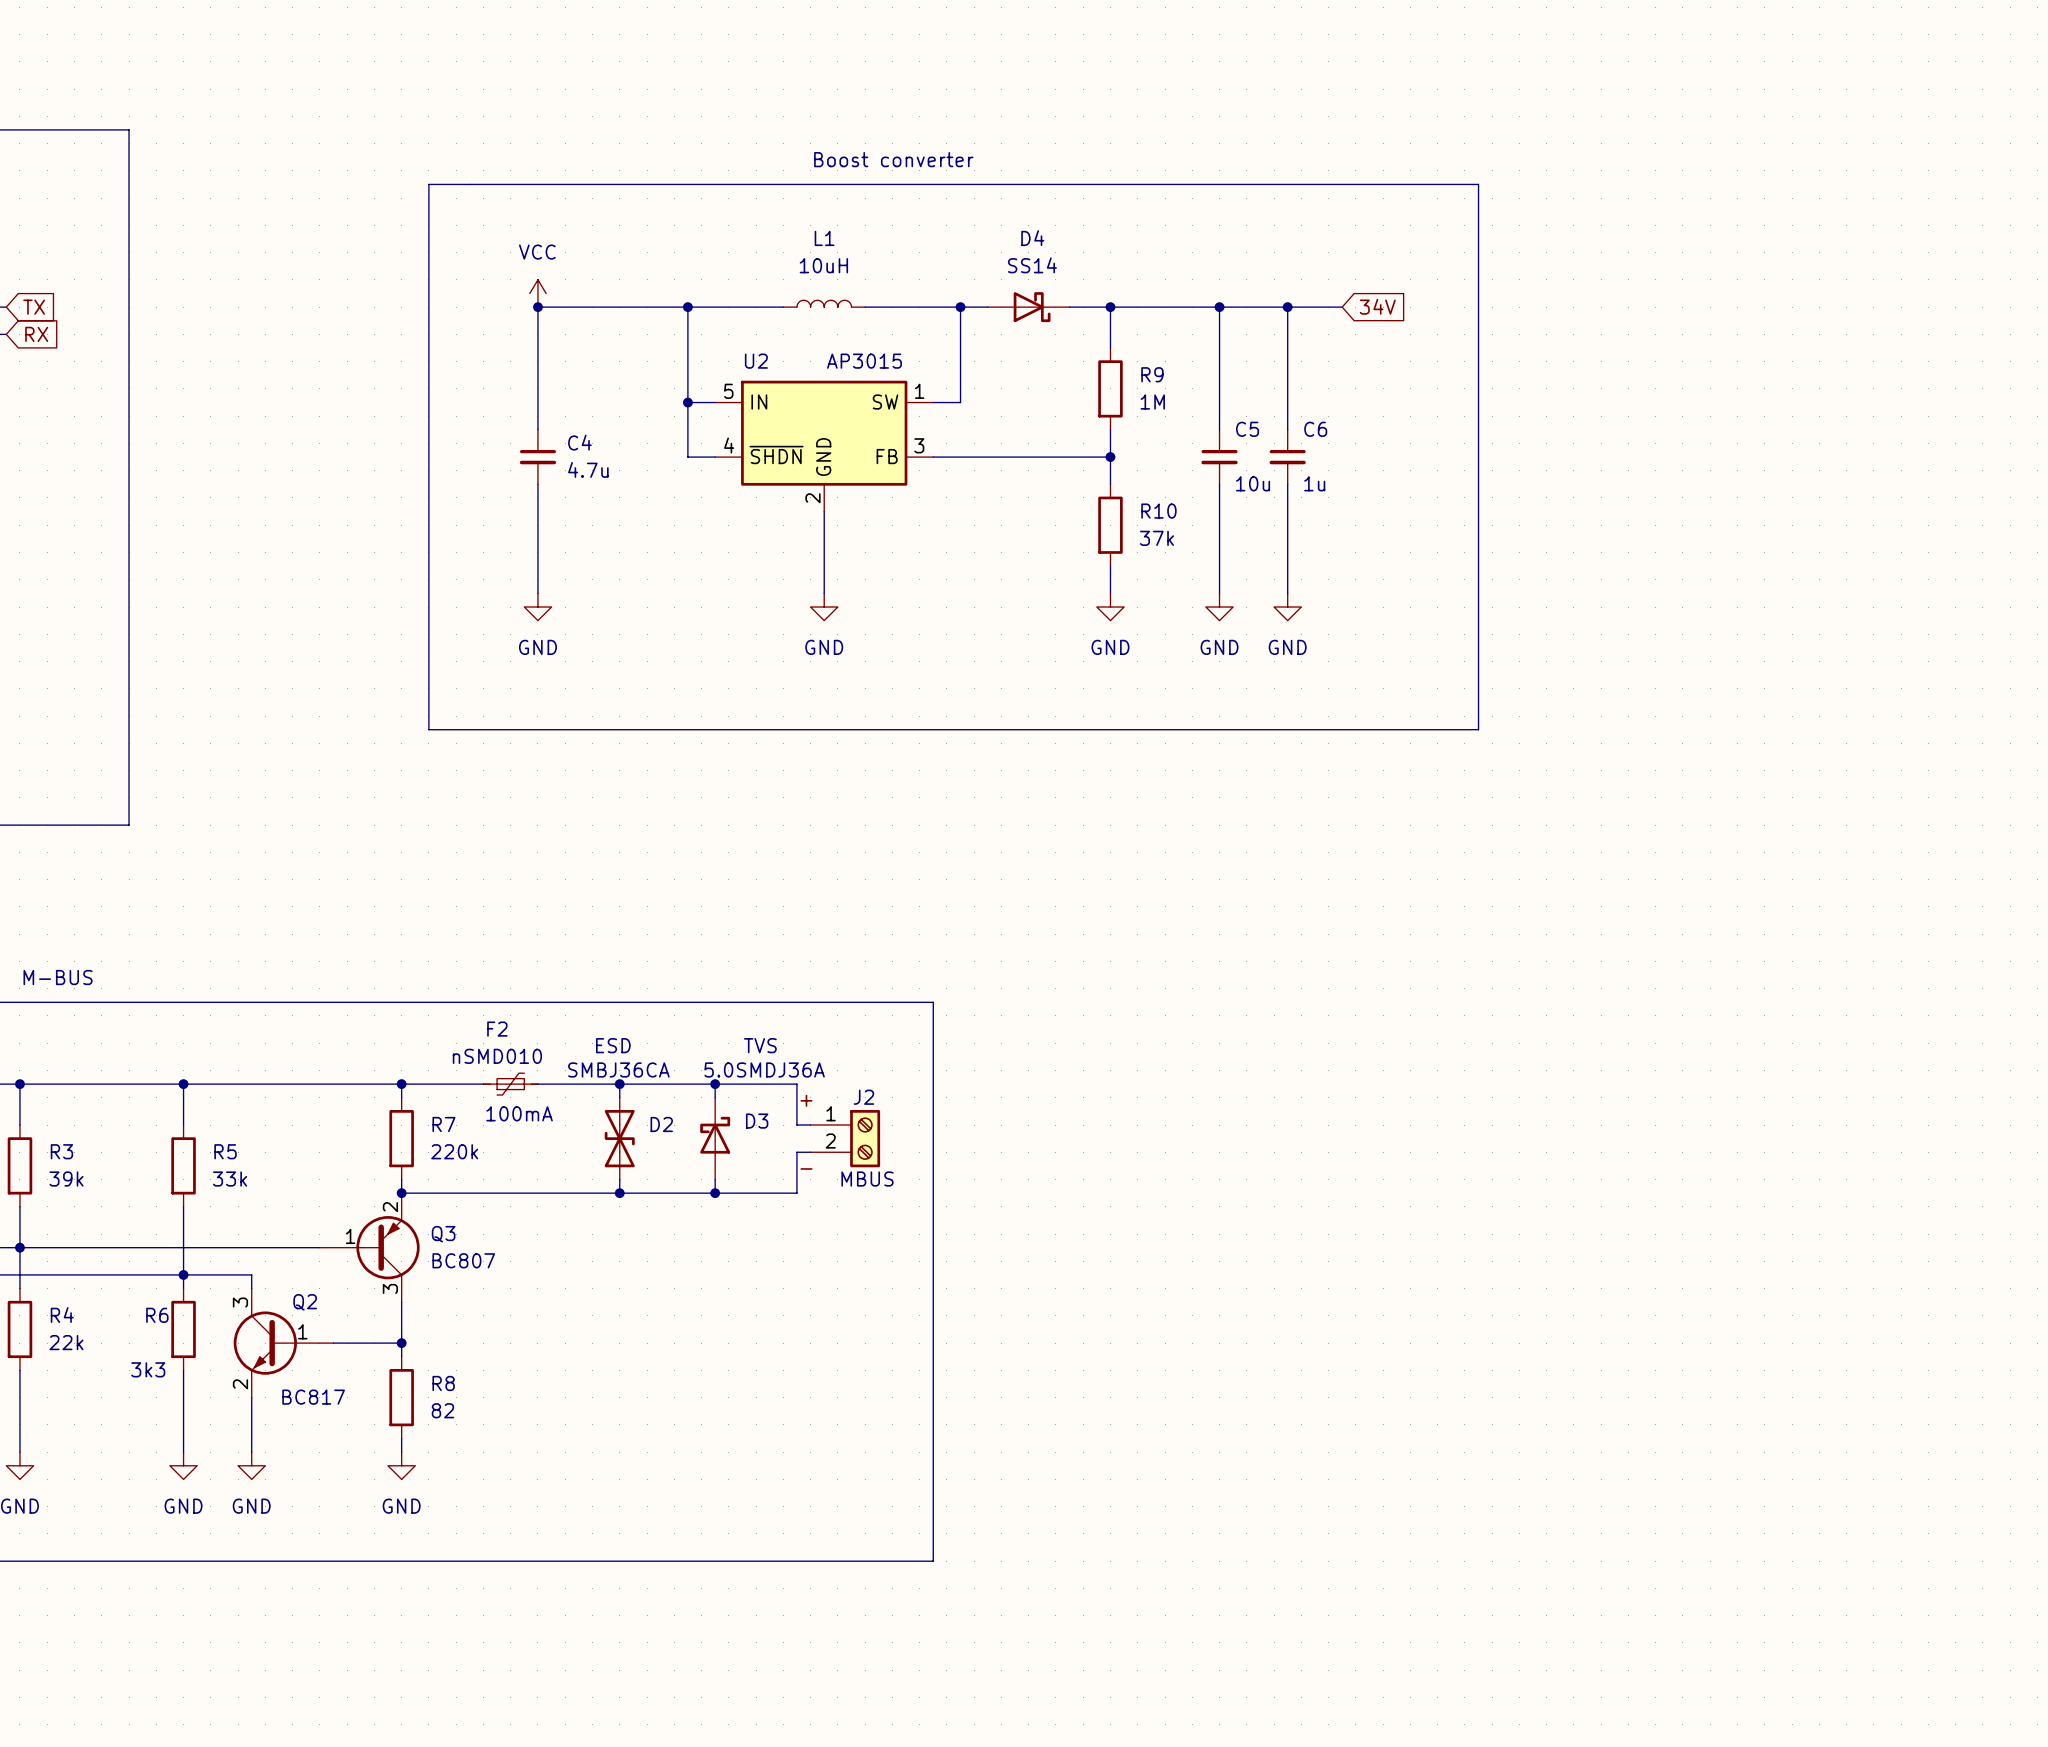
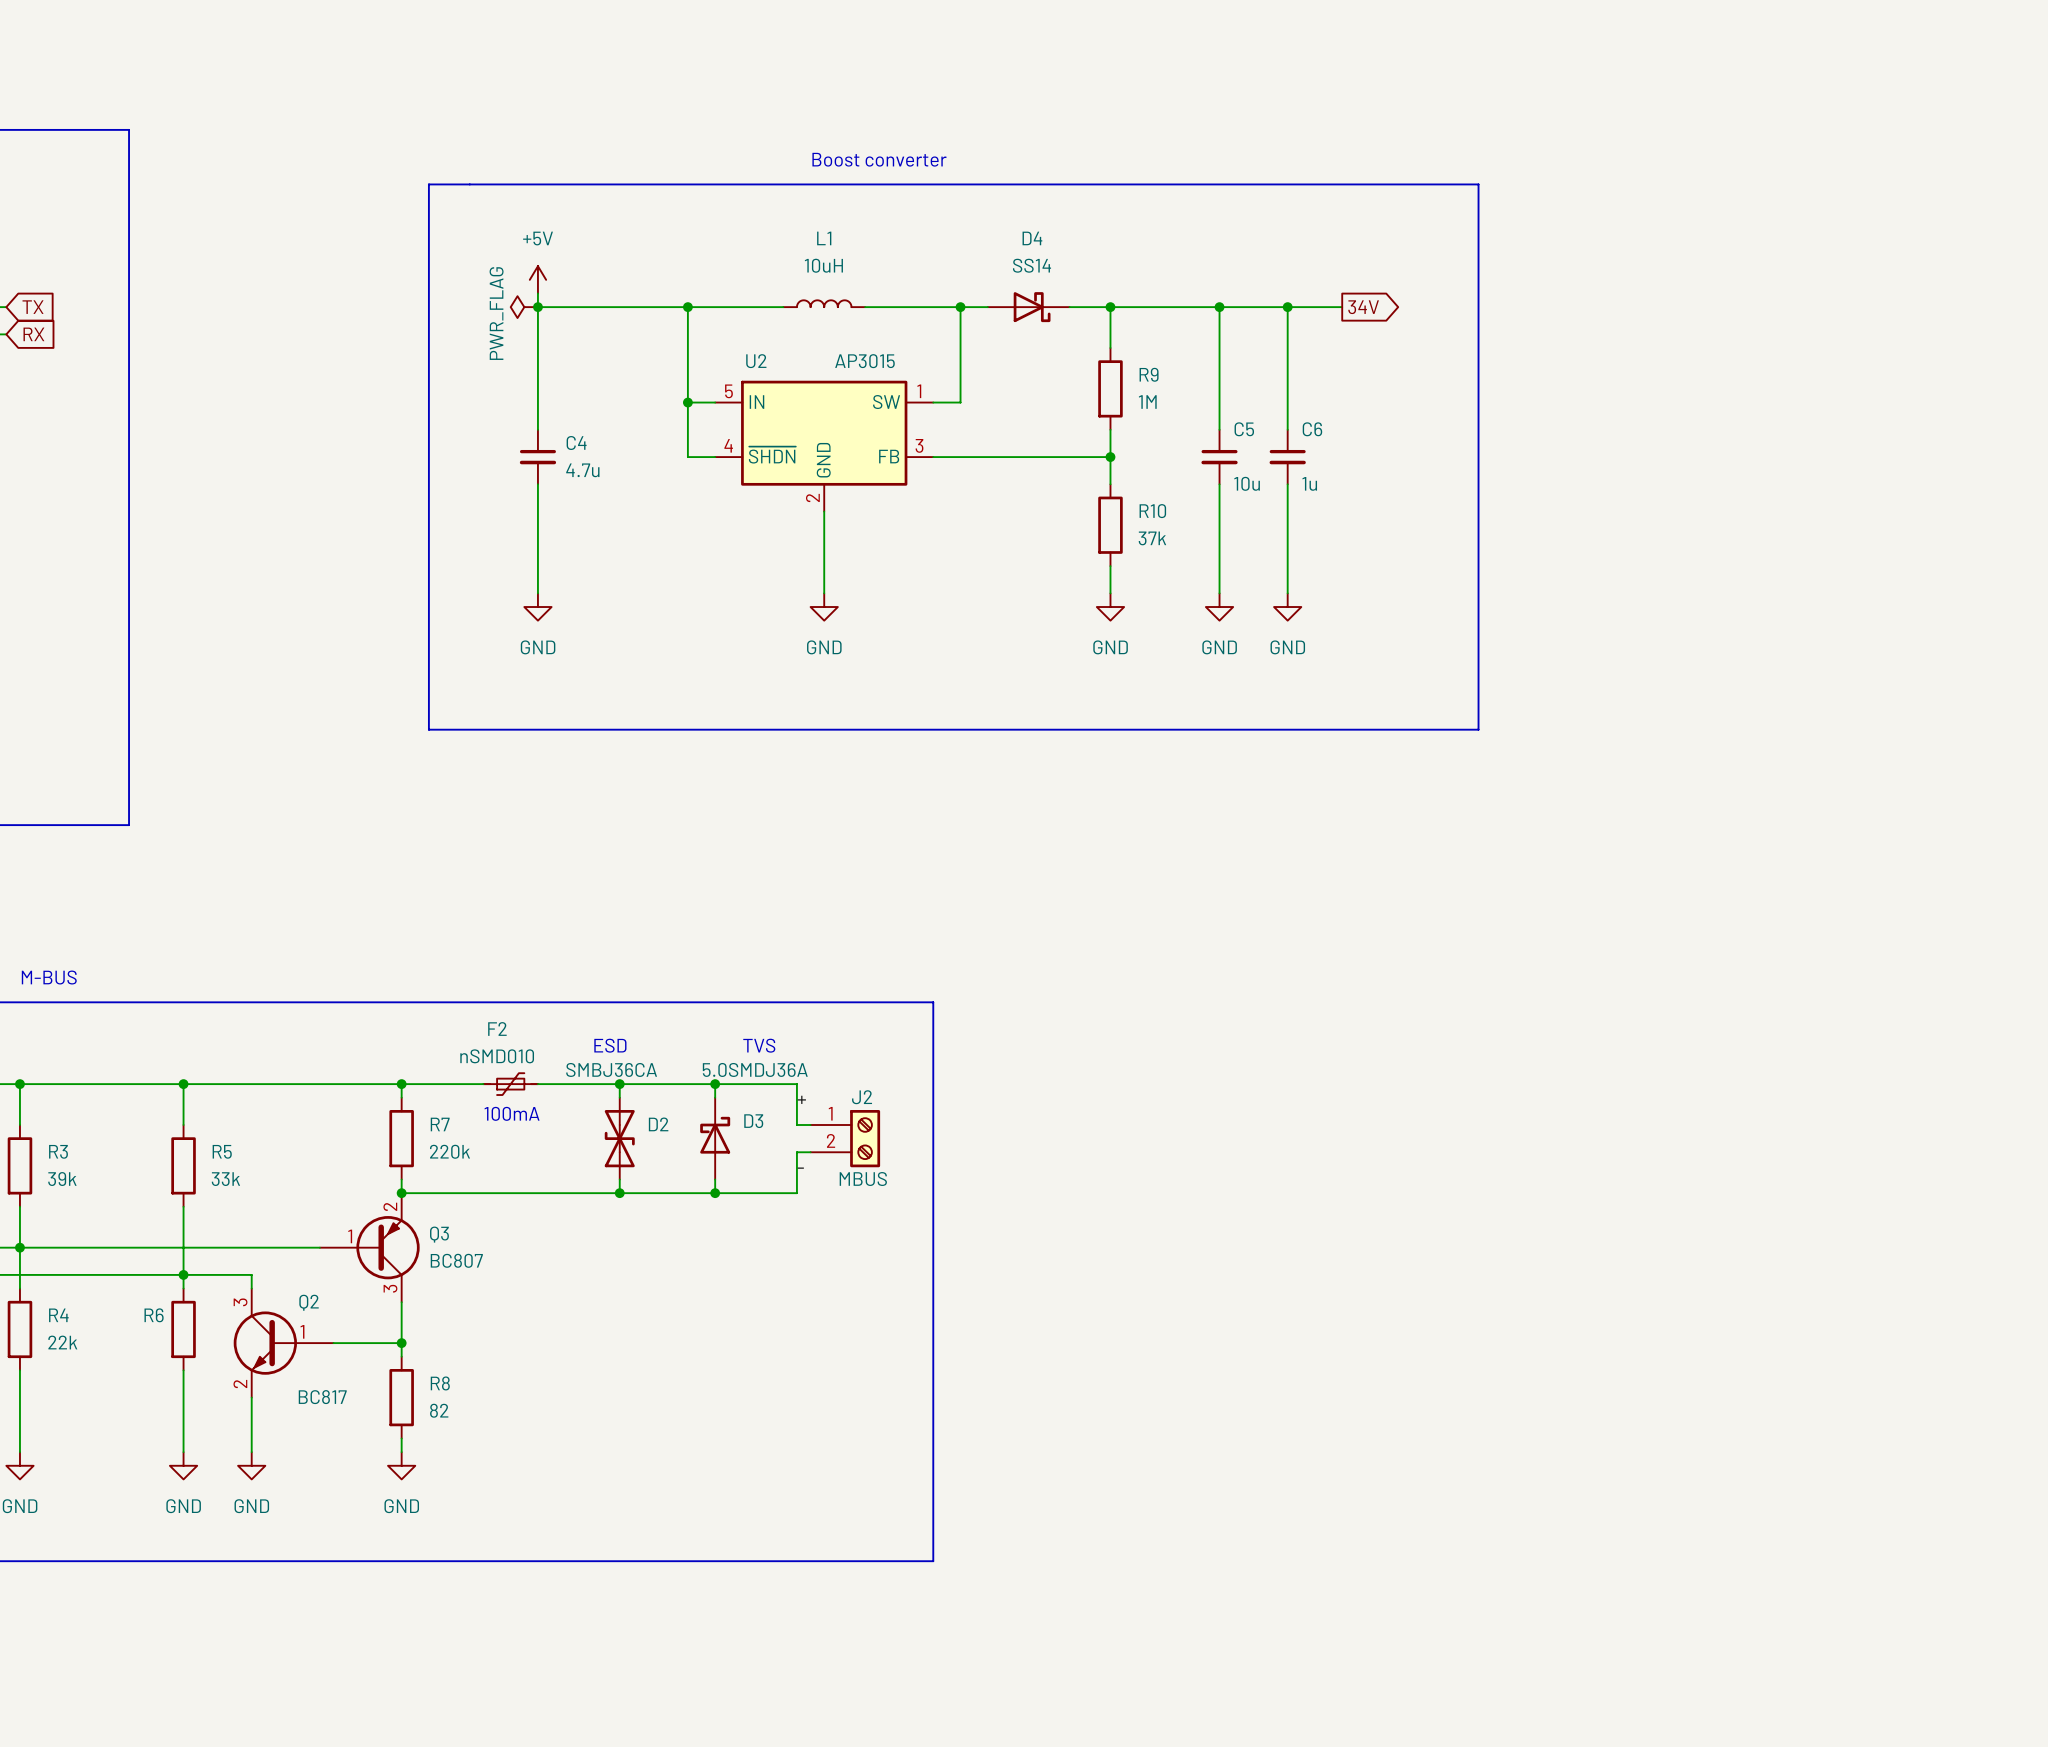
power symbol: none -> +5V (537, 279)
power symbol: VCC (537, 293) -> none
global label shape: input (1377, 306) -> output (1363, 307)
power symbol: none -> PWR_FLAG (524, 307)
R6 value: 3k3 (148, 1369) -> none

